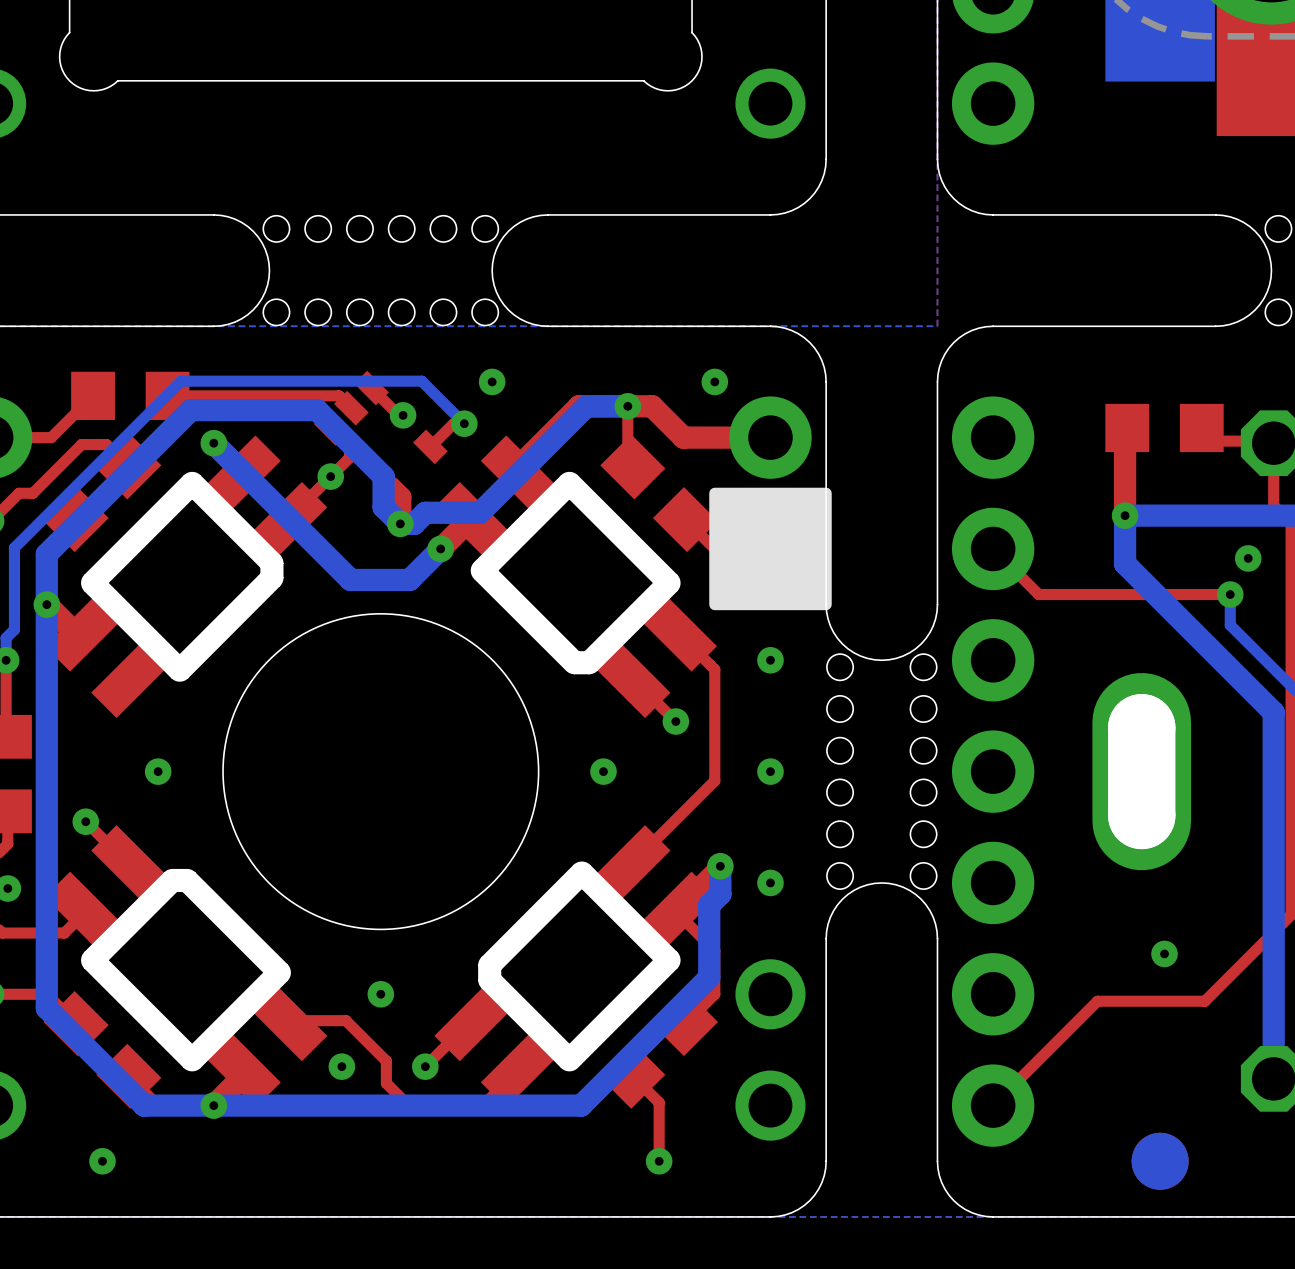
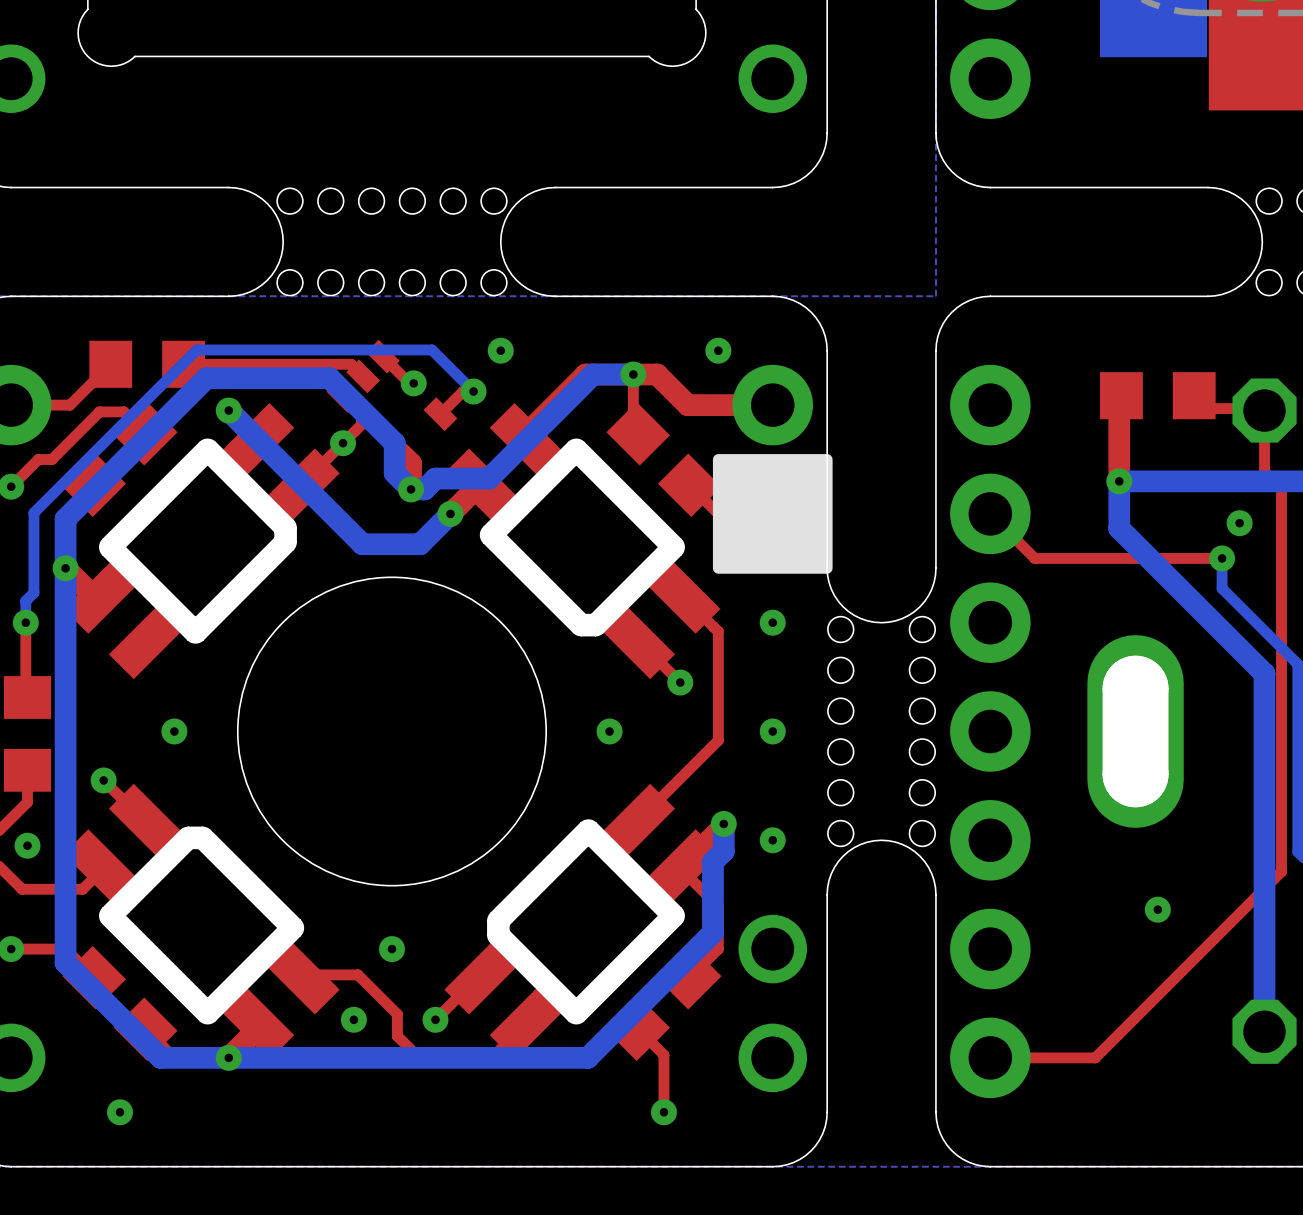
top track: (1204, 1001) (1097, 1001) (993, 1105) -> (1197, 955) (1095, 1057) (990, 1057)
drawing: [1131, 1132, 1189, 1190] -> none

